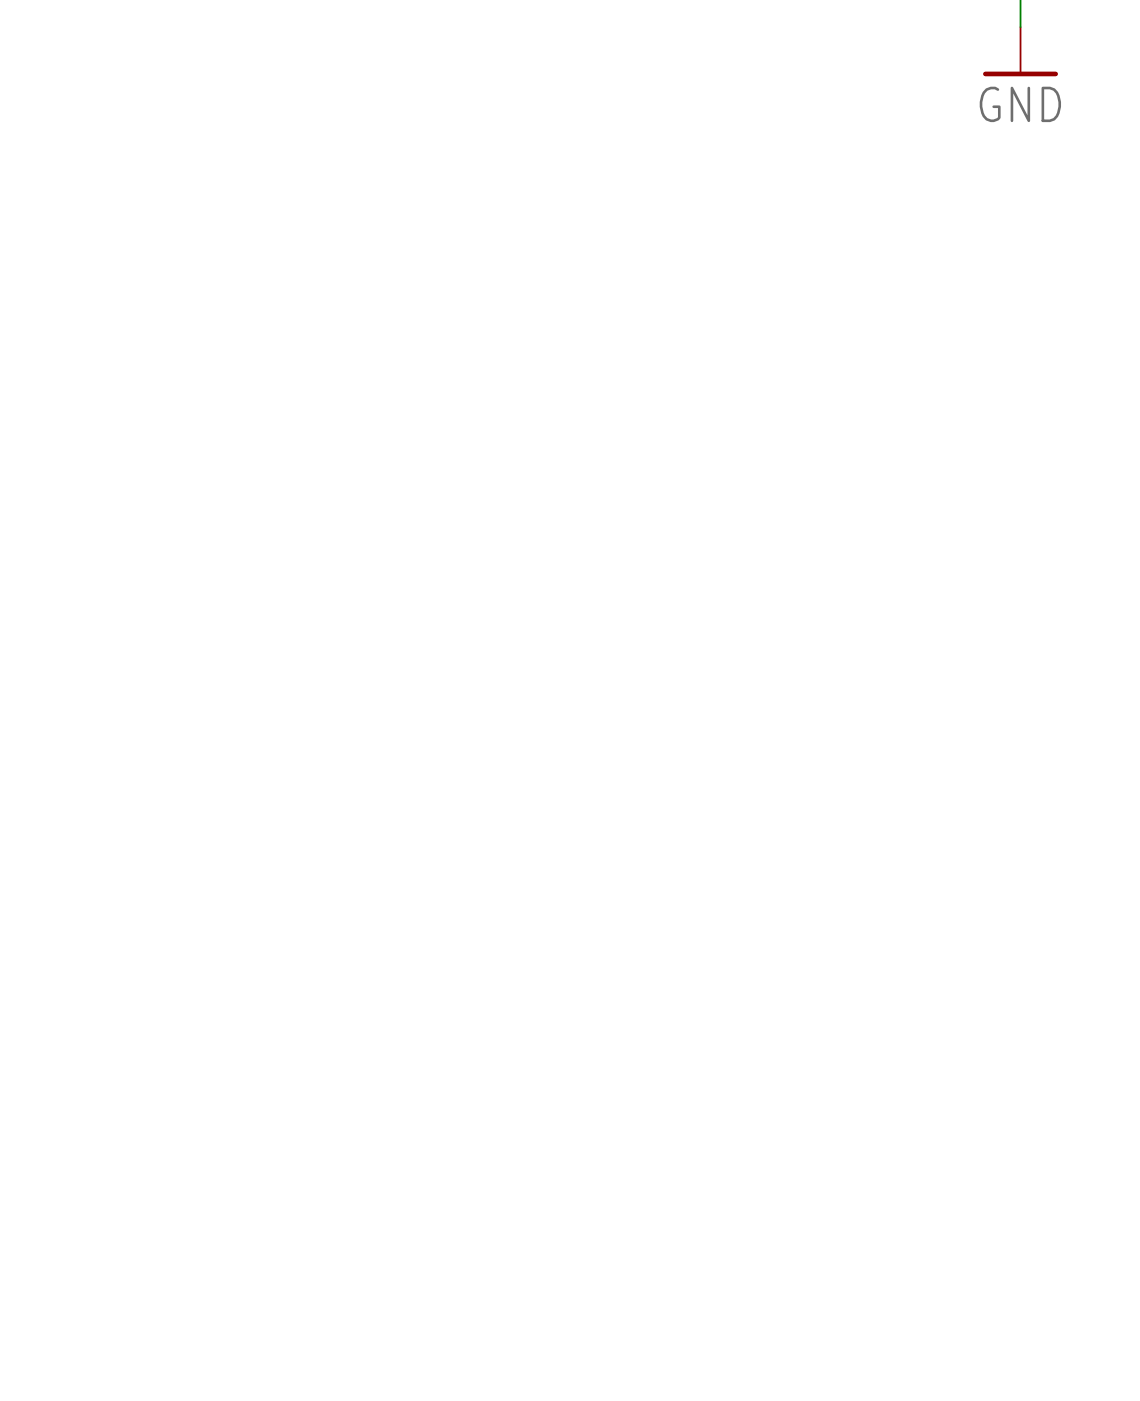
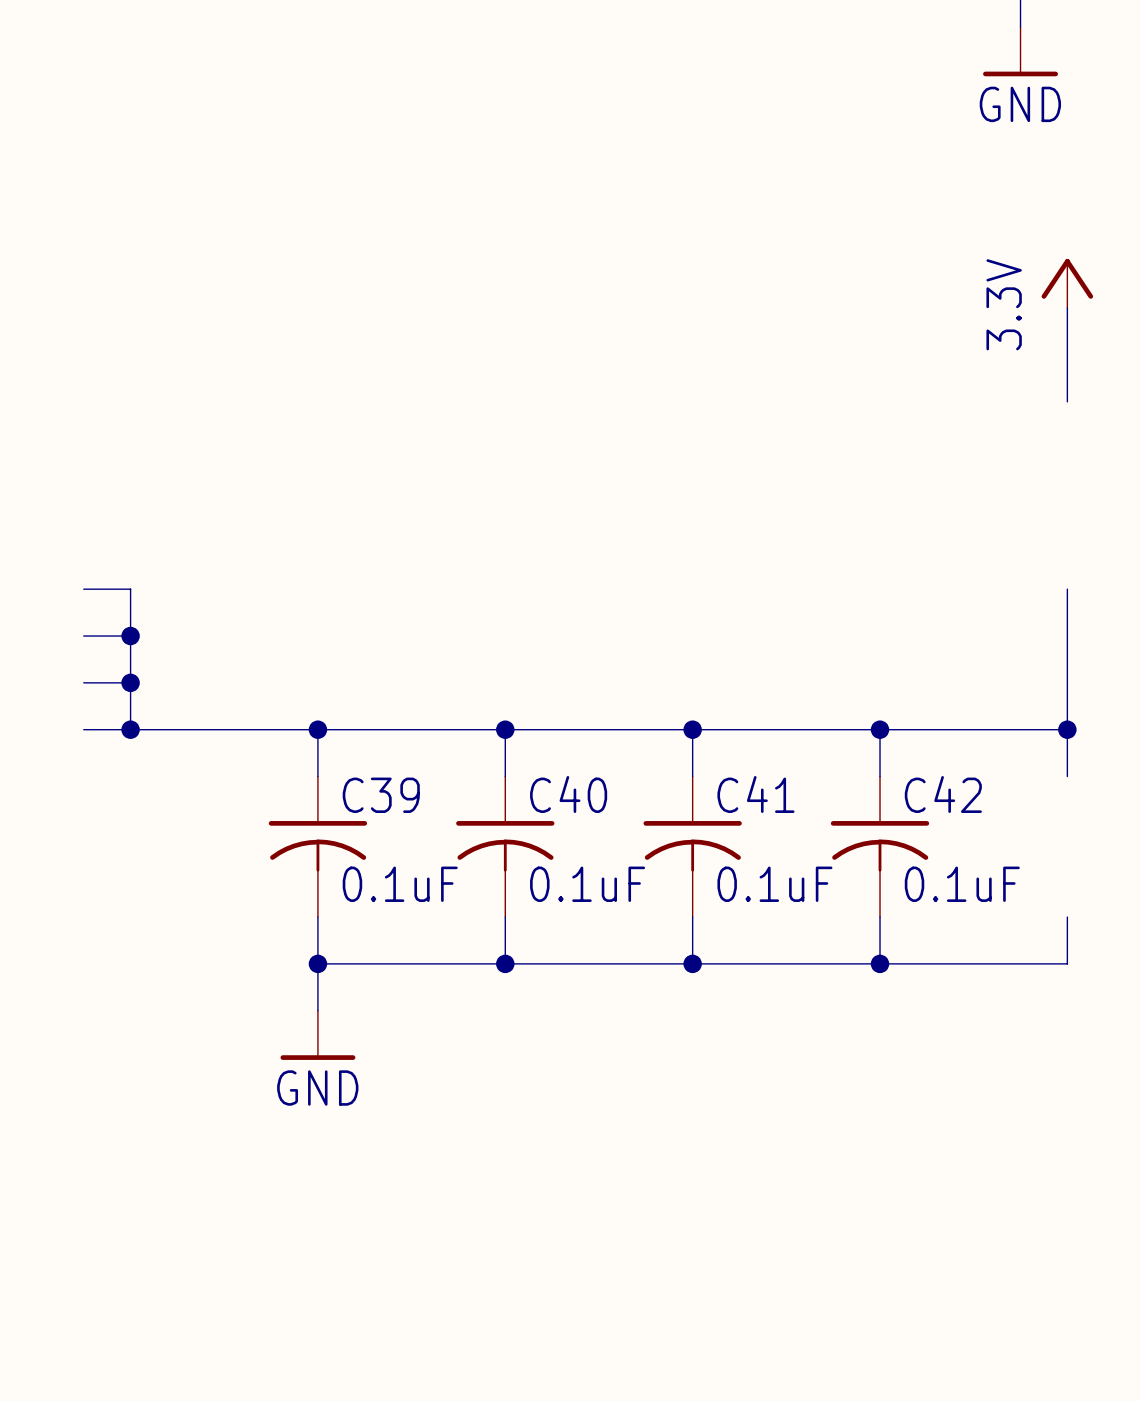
power symbol: none -> 3.3V (1067, 283)
wire: none -> (1067, 308) (1067, 401)
wire: none -> (83, 589) (130, 589) (130, 729)
wire: none -> (1067, 589) (1067, 776)
wire: none -> (83, 636) (130, 636)
junction: none -> (130, 636)
wire: none -> (83, 682) (130, 682)
junction: none -> (130, 682)
wire: none -> (83, 729) (1067, 729)
junction: none -> (130, 729)
wire: none -> (317, 729) (317, 776)
junction: none -> (317, 729)
wire: none -> (505, 729) (505, 776)
junction: none -> (505, 729)
wire: none -> (692, 729) (692, 776)
junction: none -> (692, 729)
wire: none -> (880, 729) (880, 776)
junction: none -> (880, 729)
junction: none -> (1067, 729)
C39: none -> 0.1uF (317, 846)
C40: none -> 0.1uF (505, 846)
C41: none -> 0.1uF (692, 846)
C42: none -> 0.1uF (880, 846)
wire: none -> (317, 917) (317, 1010)
wire: none -> (505, 917) (505, 963)
wire: none -> (692, 917) (692, 963)
wire: none -> (880, 917) (880, 963)
wire: none -> (1067, 917) (1067, 963) (317, 963)
junction: none -> (317, 963)
junction: none -> (505, 963)
junction: none -> (692, 963)
junction: none -> (880, 963)
power symbol: none -> GND (317, 1035)

